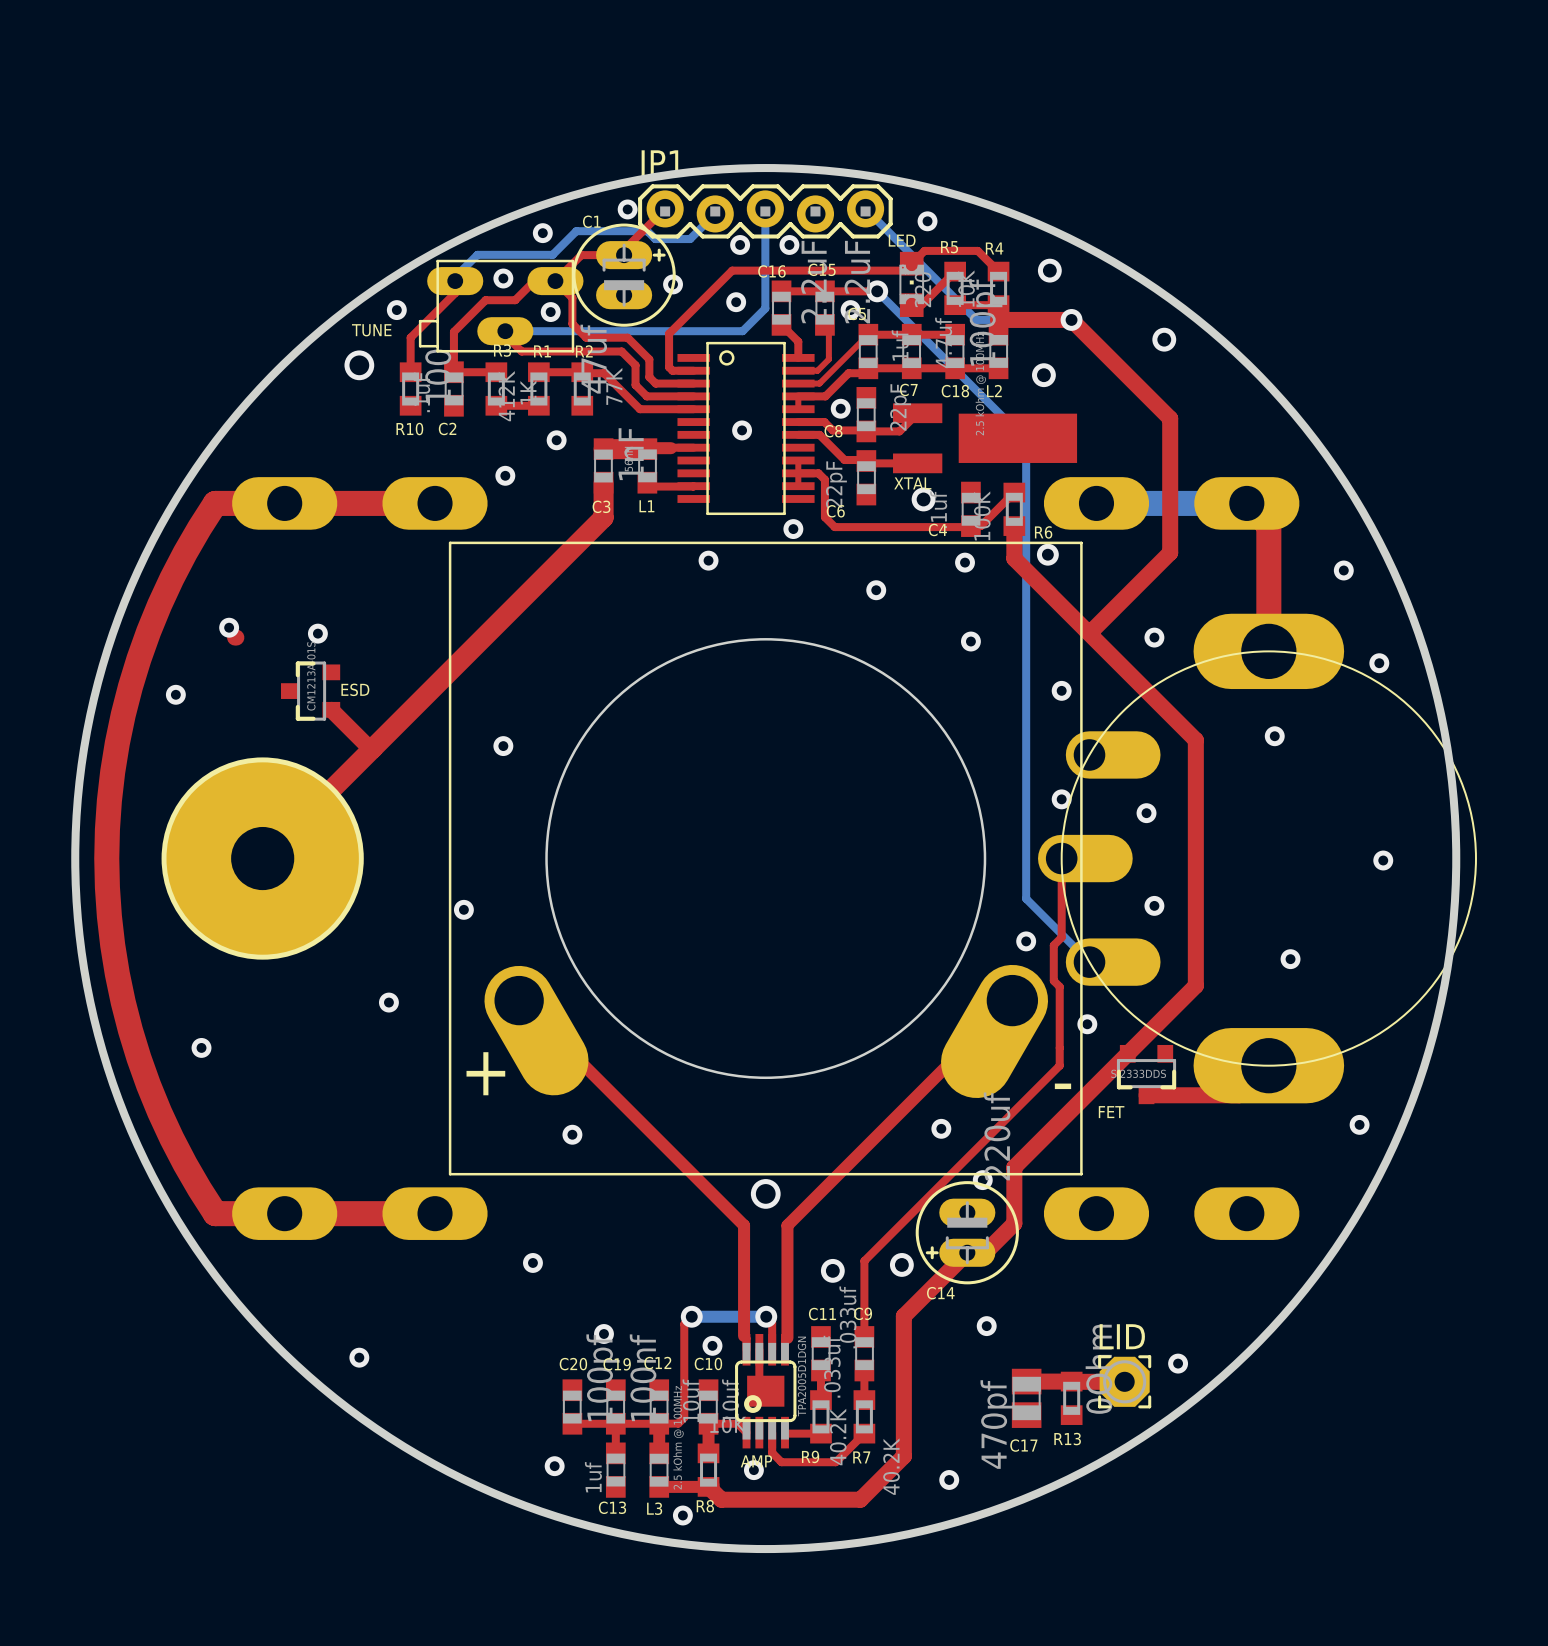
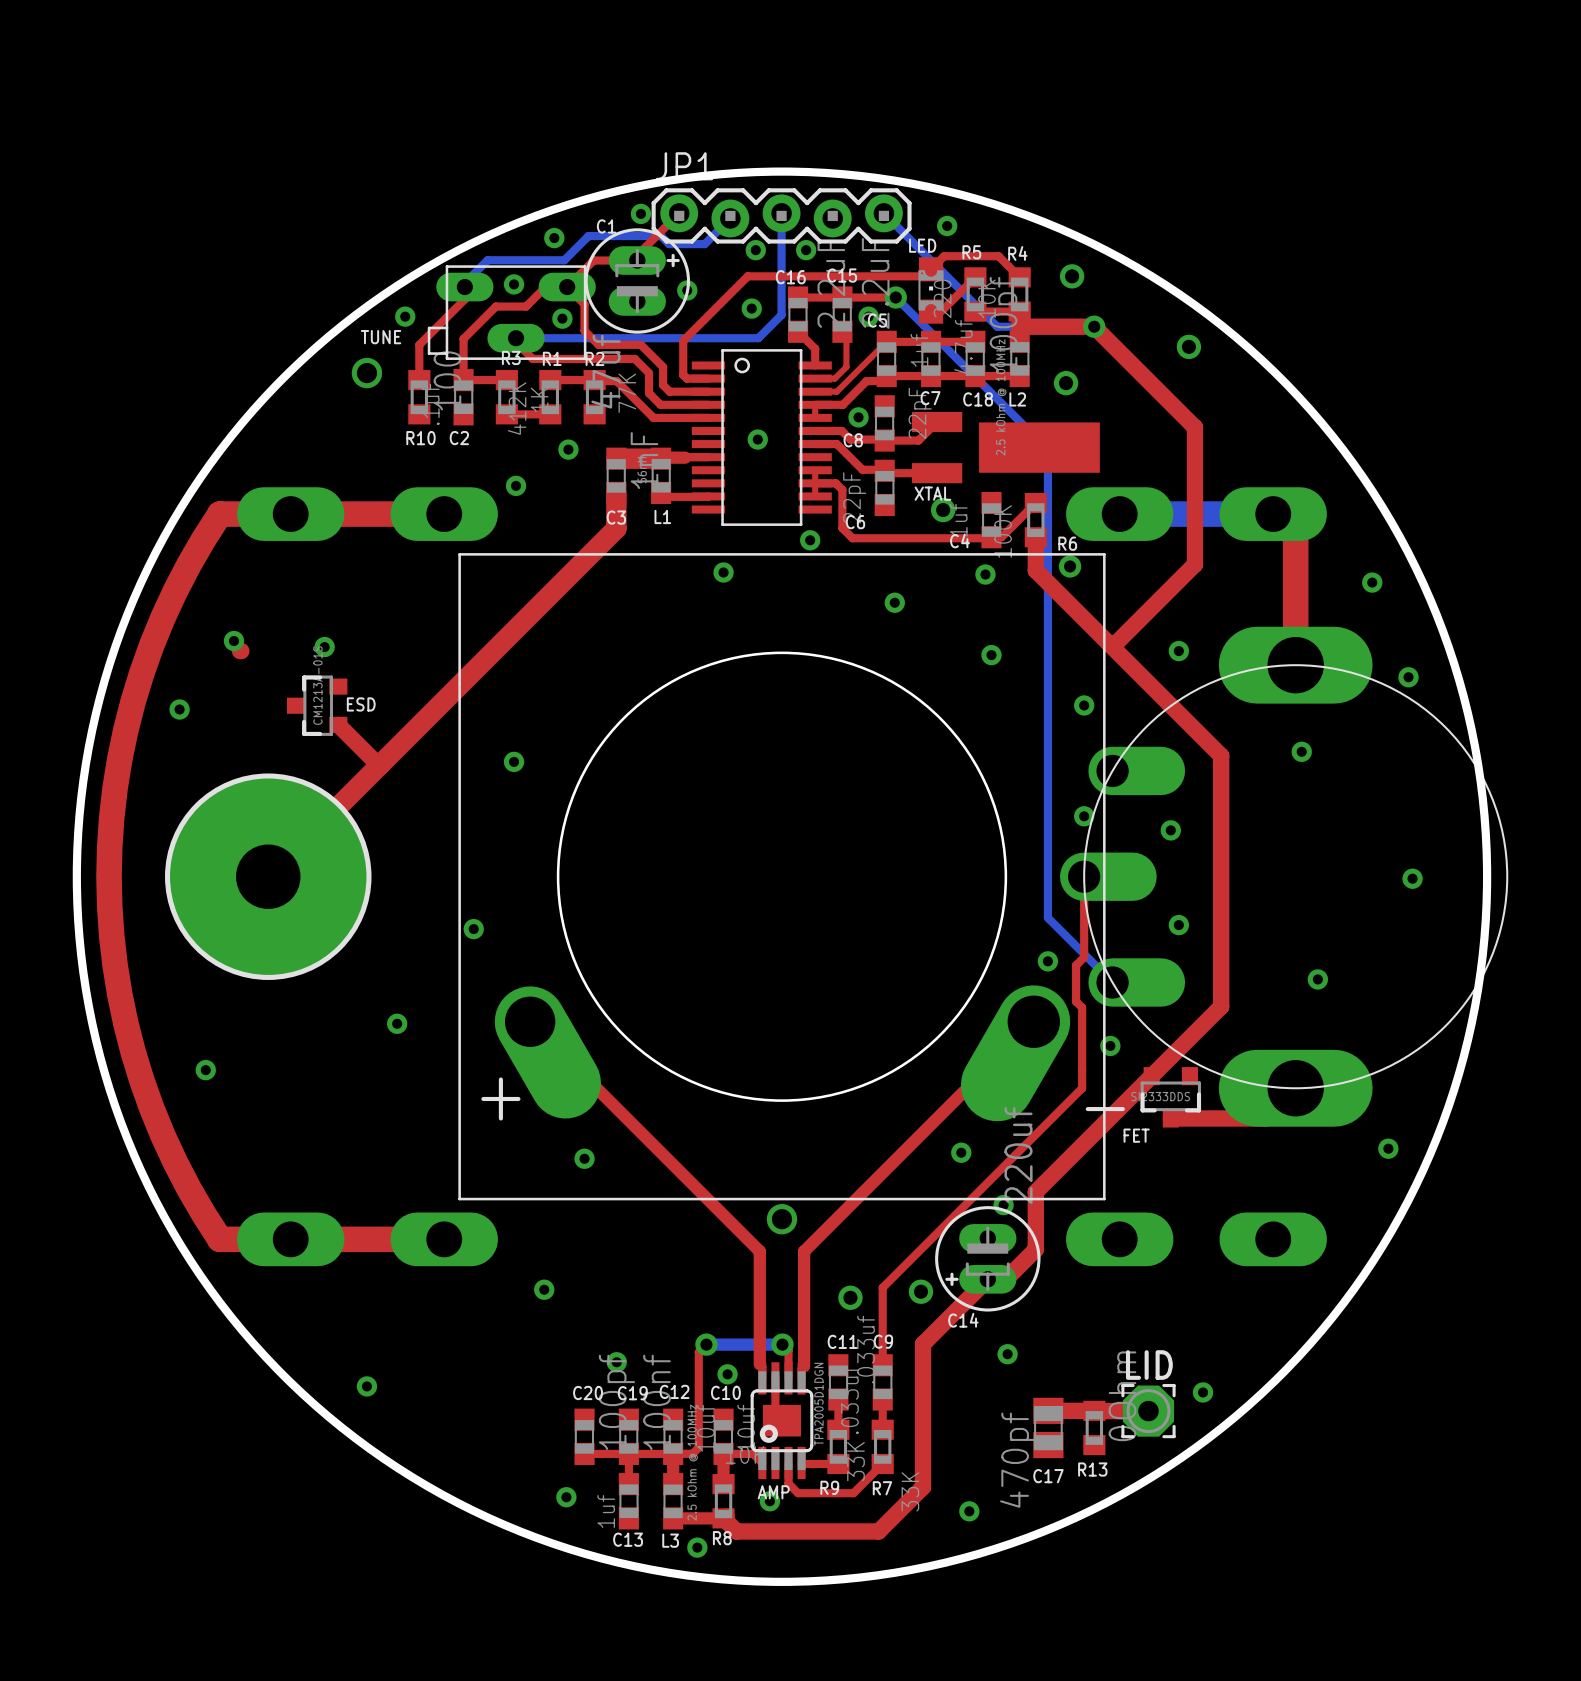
R9 value: 40.2K (838, 1437) -> 33K (856, 1461)
R7 value: 40.2K (891, 1466) -> 33K (910, 1491)

